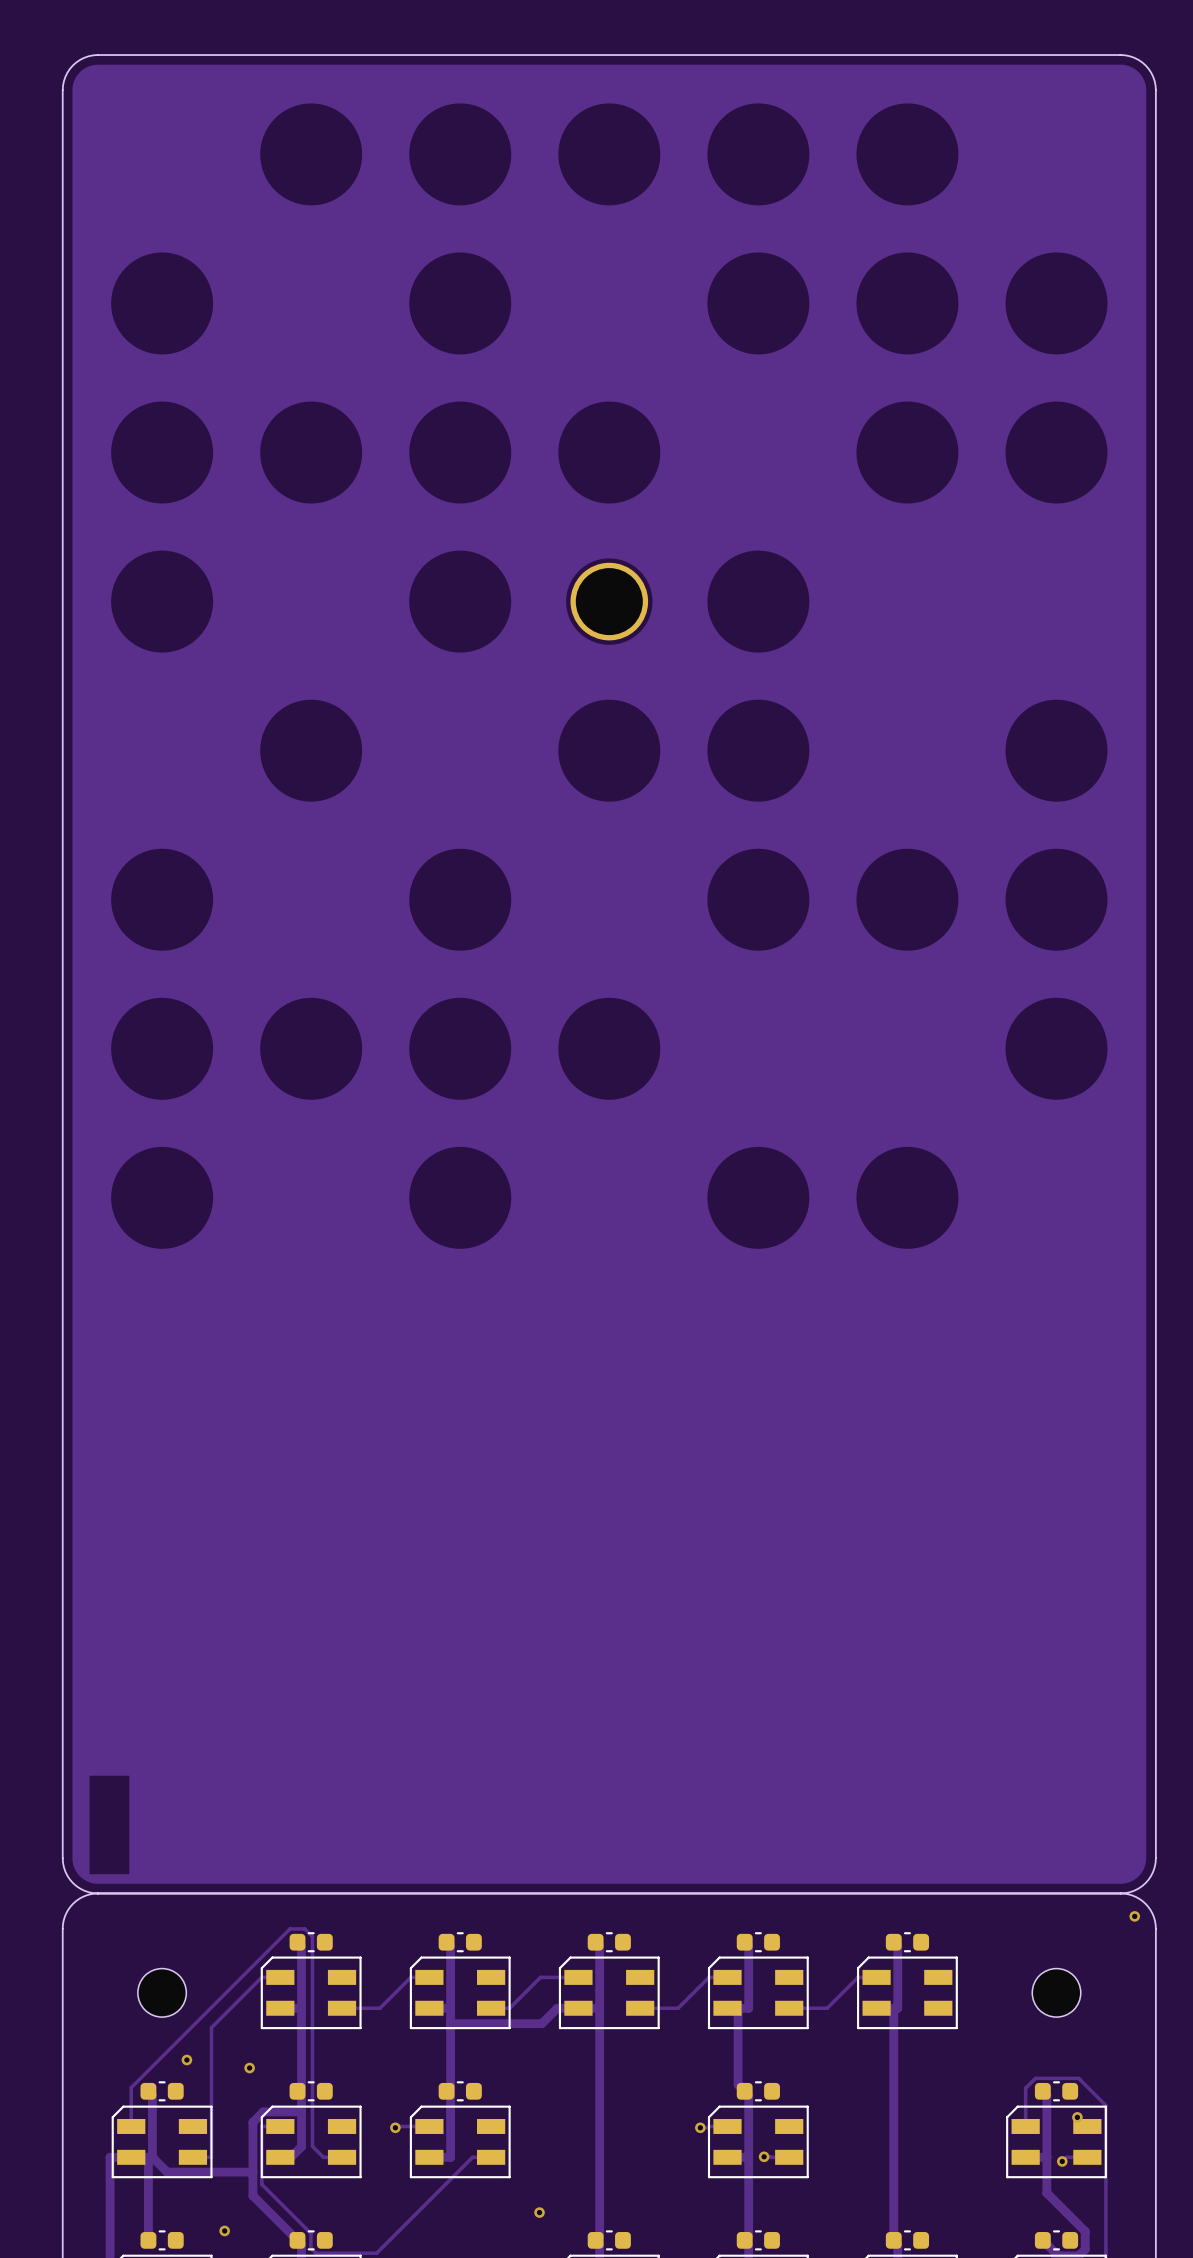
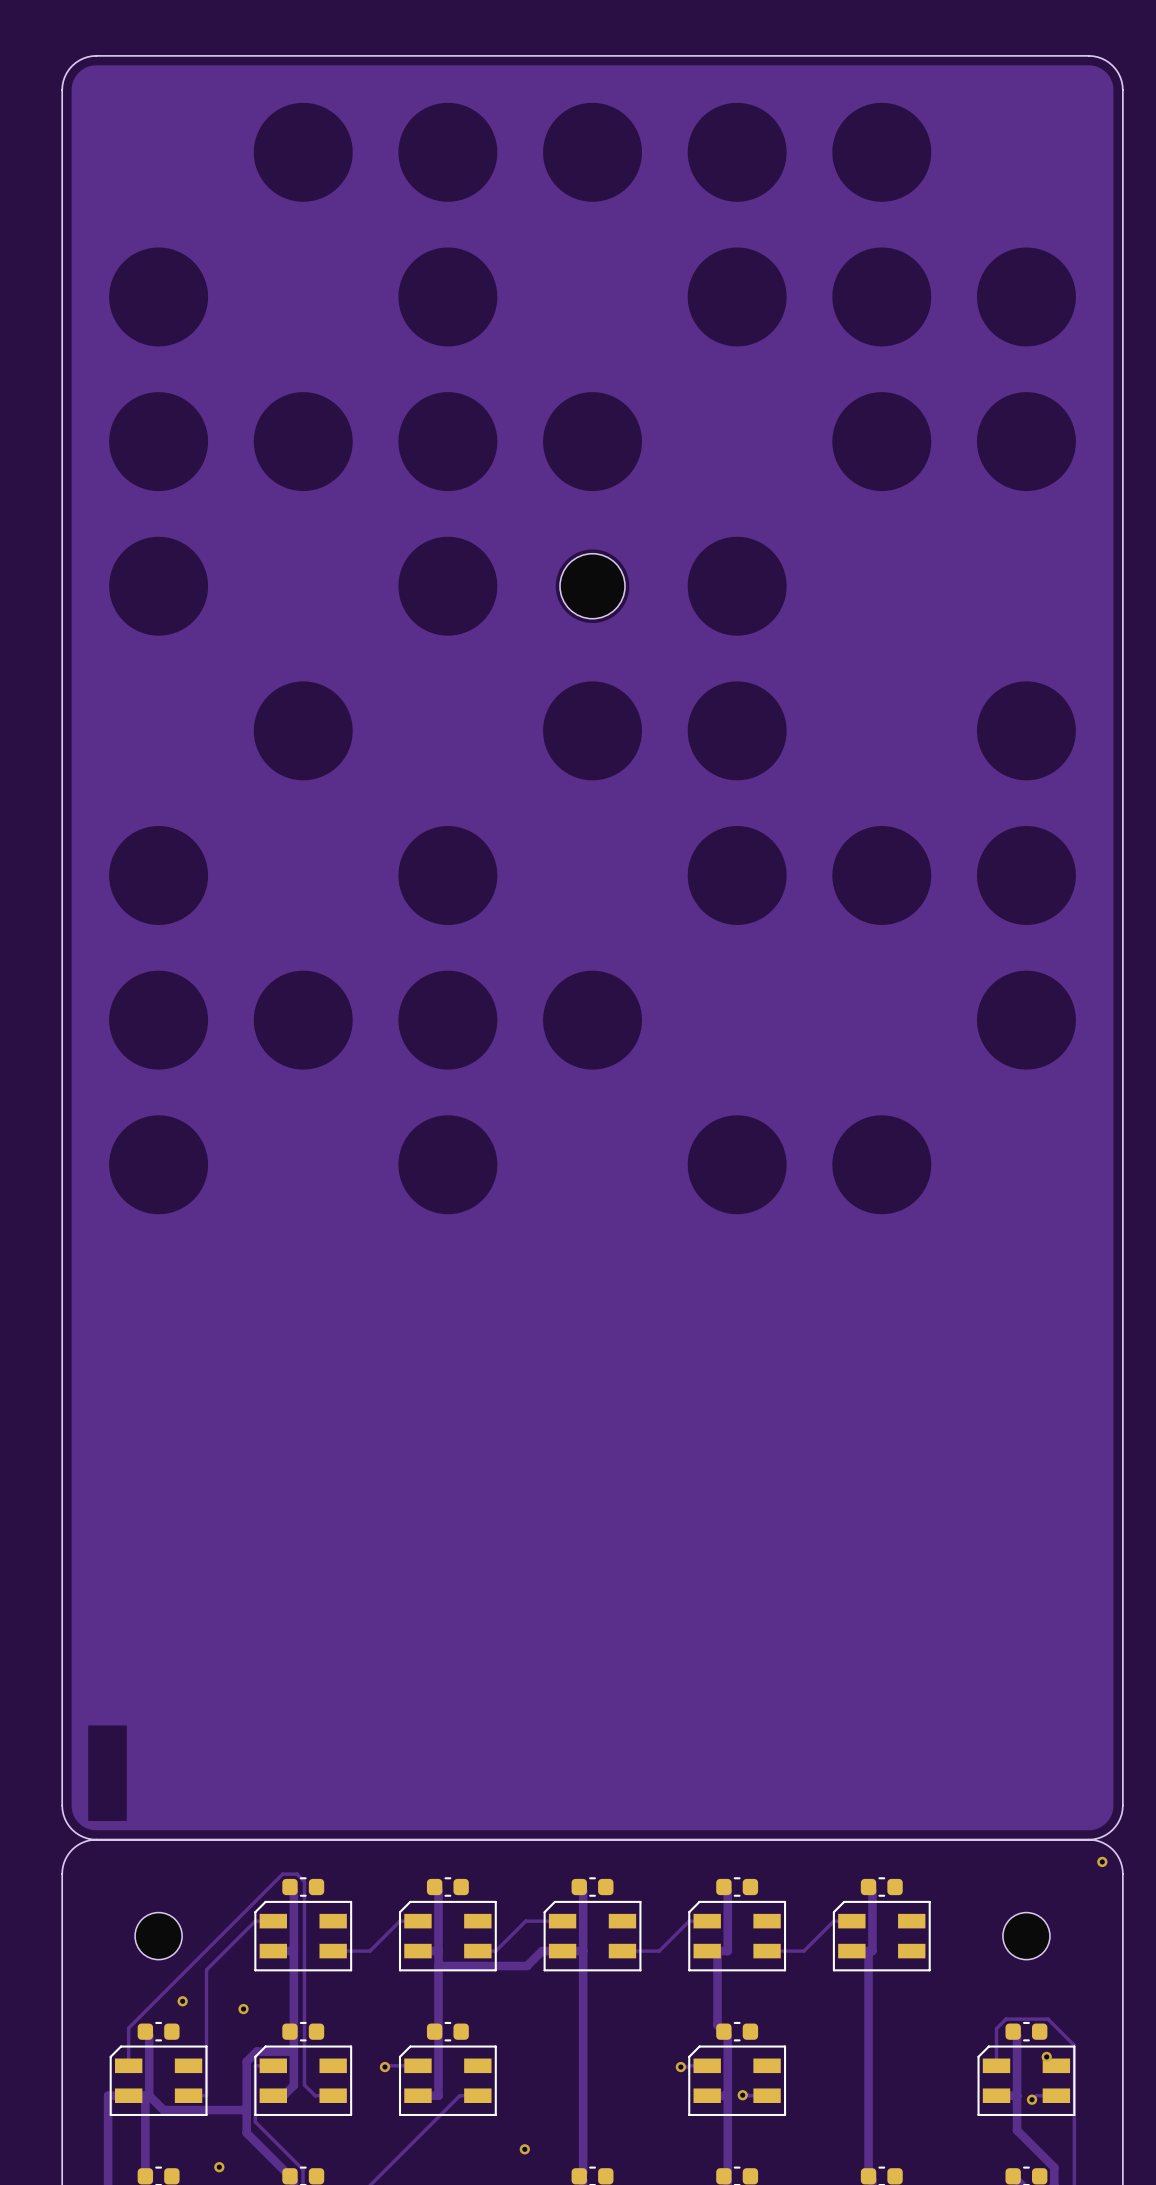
drawing shape: [72, 64, 1147, 1884] -> [71, 65, 1114, 1831]
part footprint: [570, 562, 649, 641] -> [560, 553, 626, 619]

